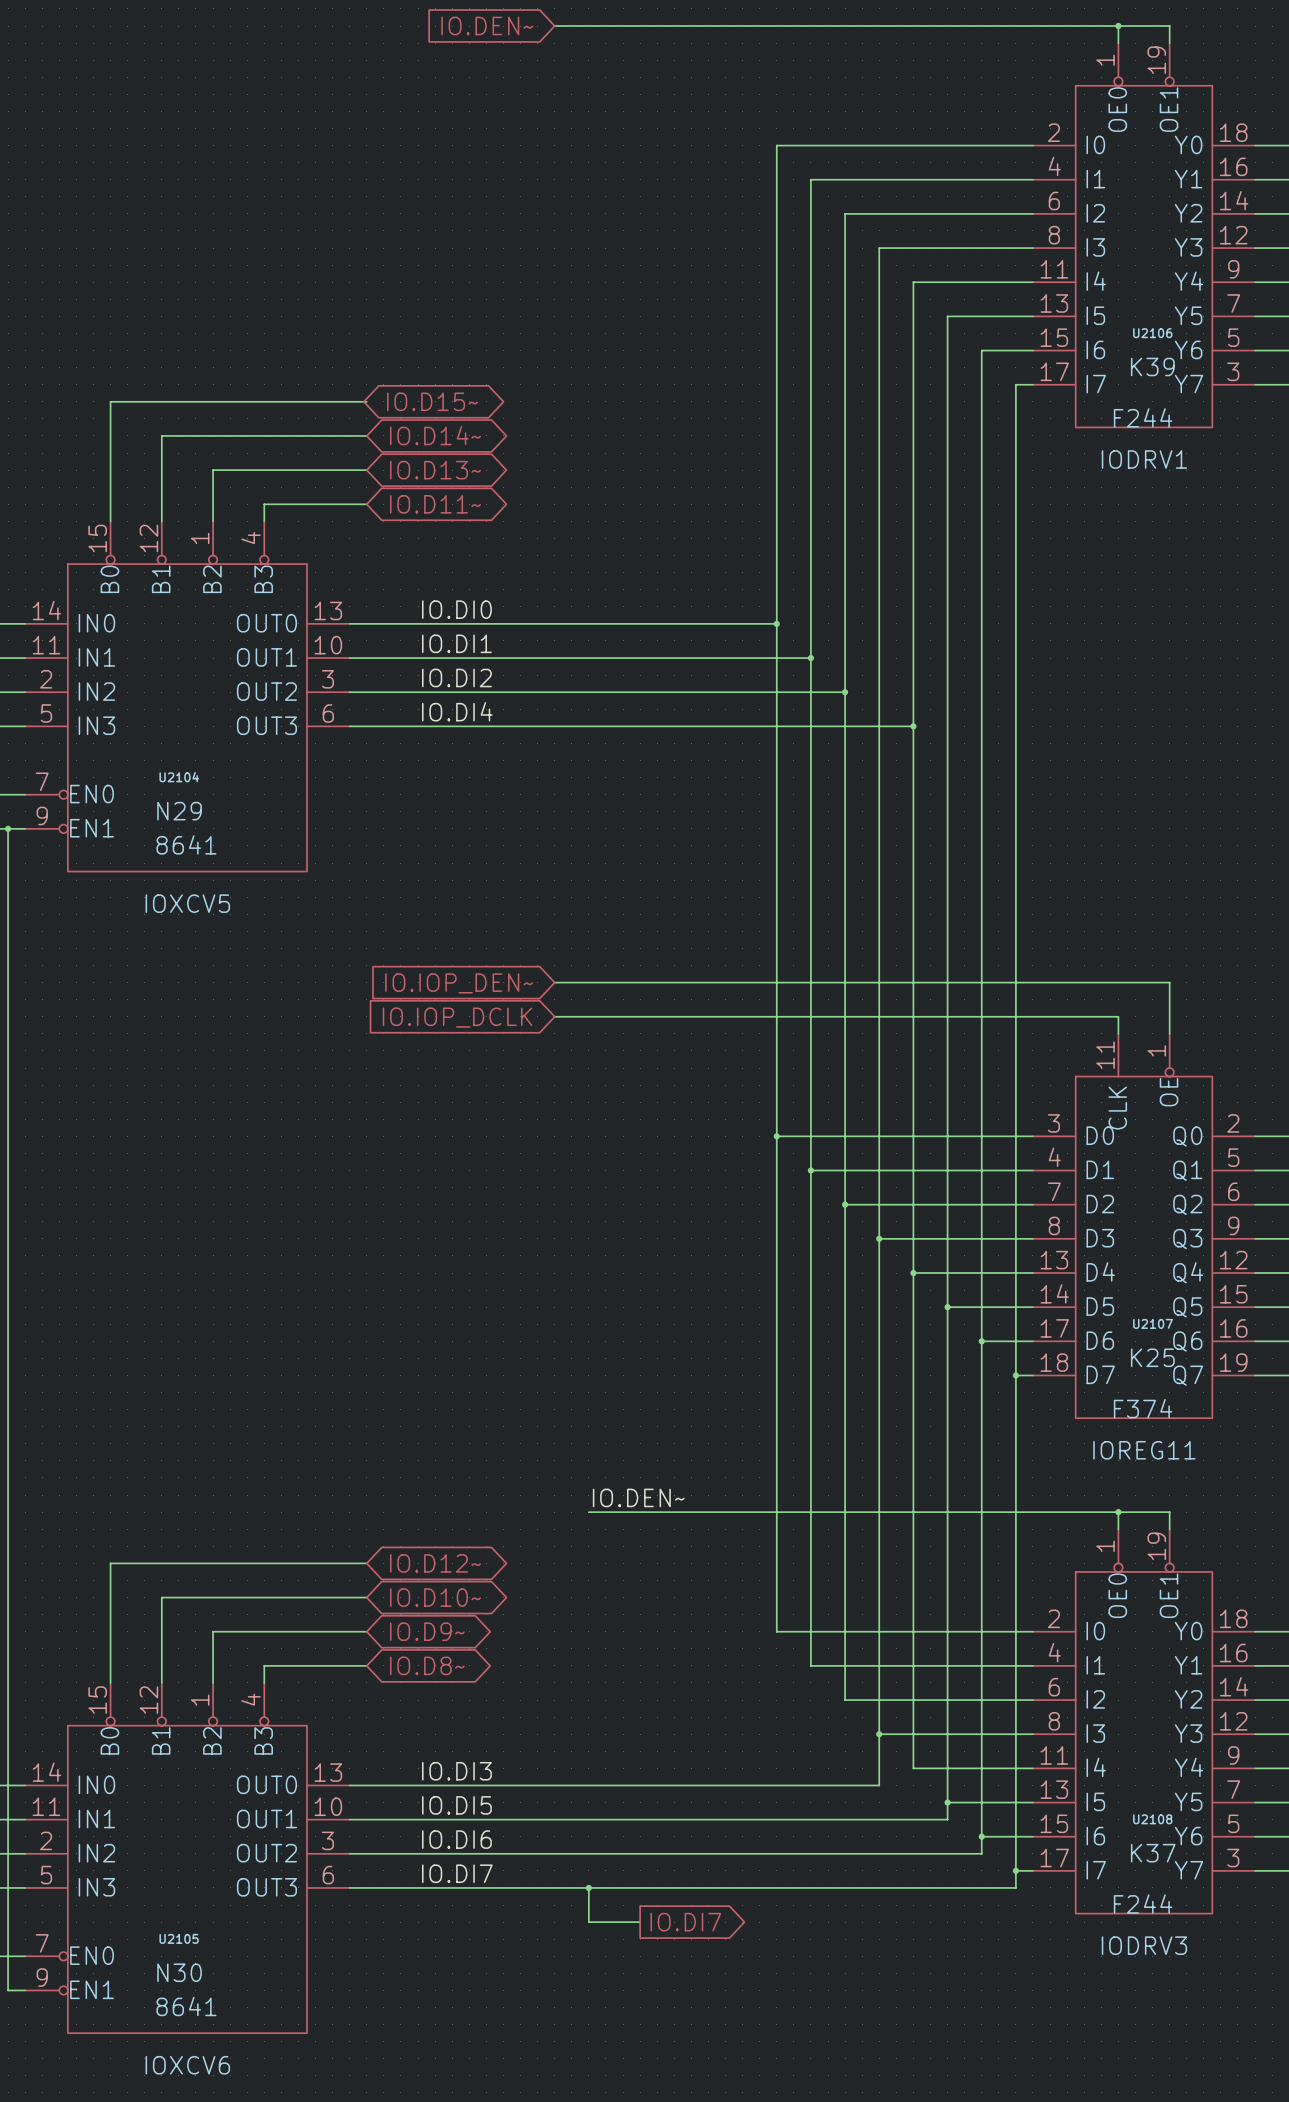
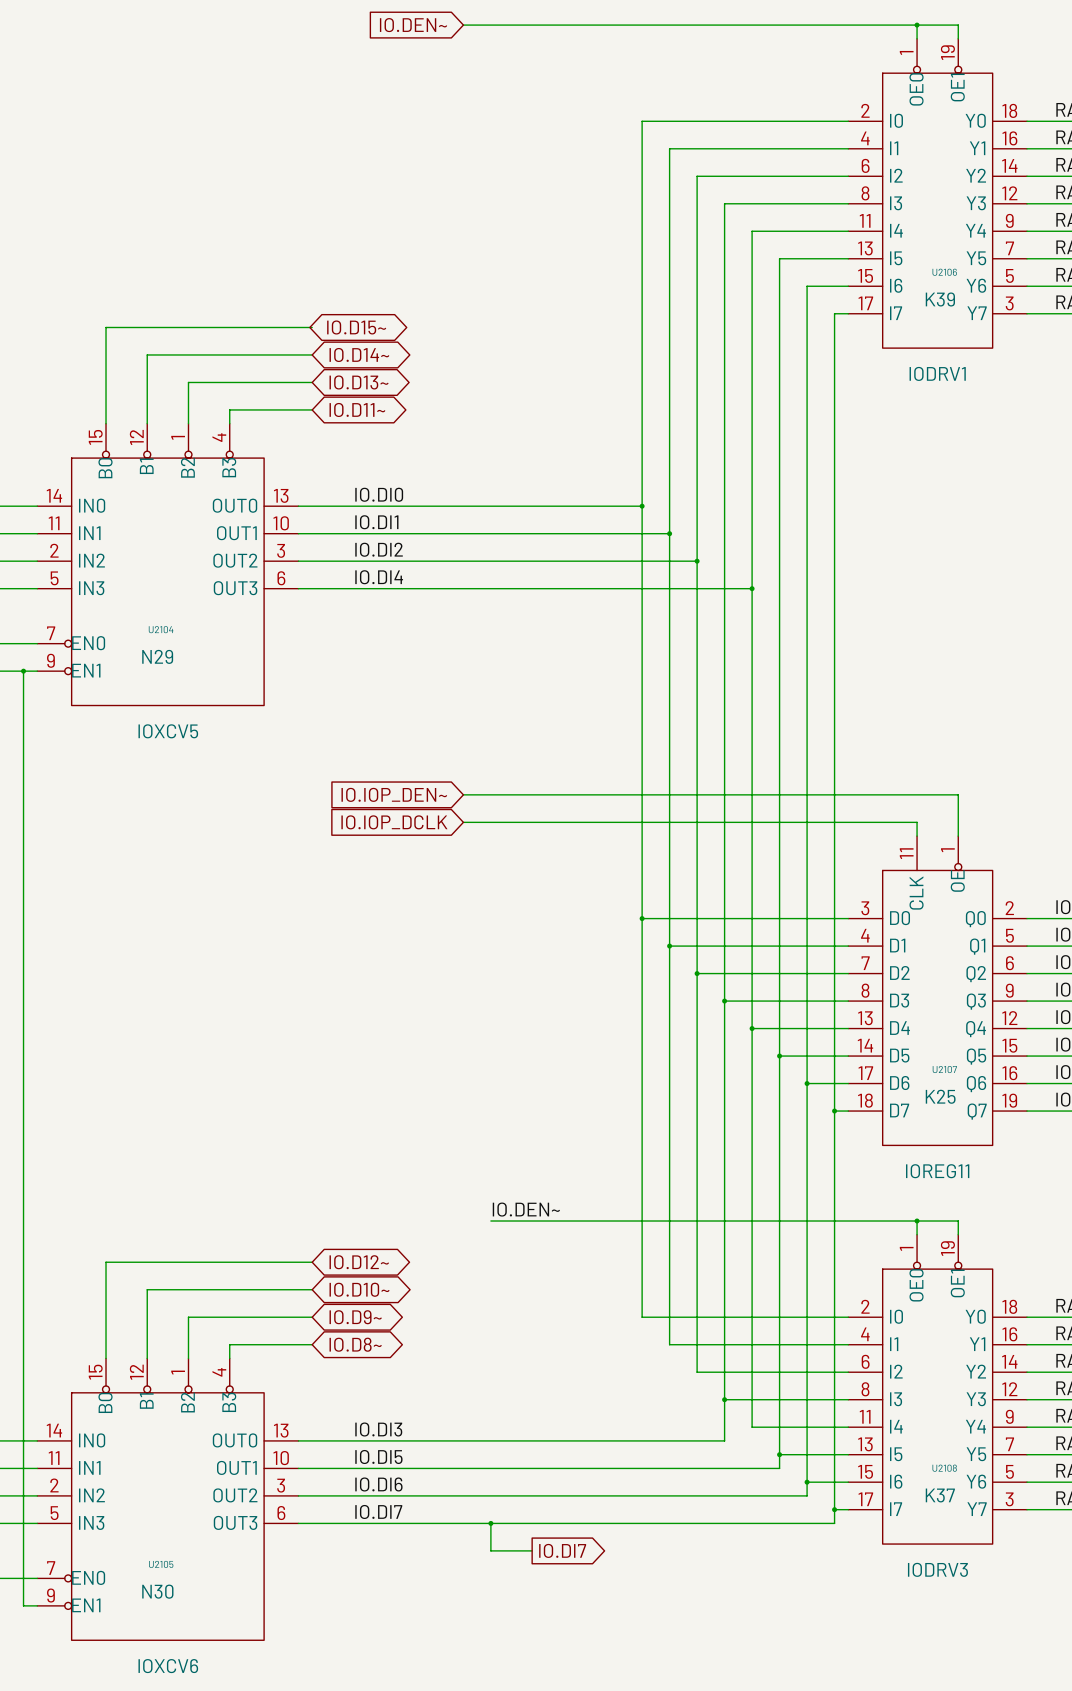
U2106 value: F244 (1143, 417) -> none
U2104 value: 8641 (186, 844) -> none
U2107 value: F374 (1143, 1408) -> none
U2108 value: F244 (1143, 1904) -> none
U2105 value: 8641 (186, 2006) -> none

